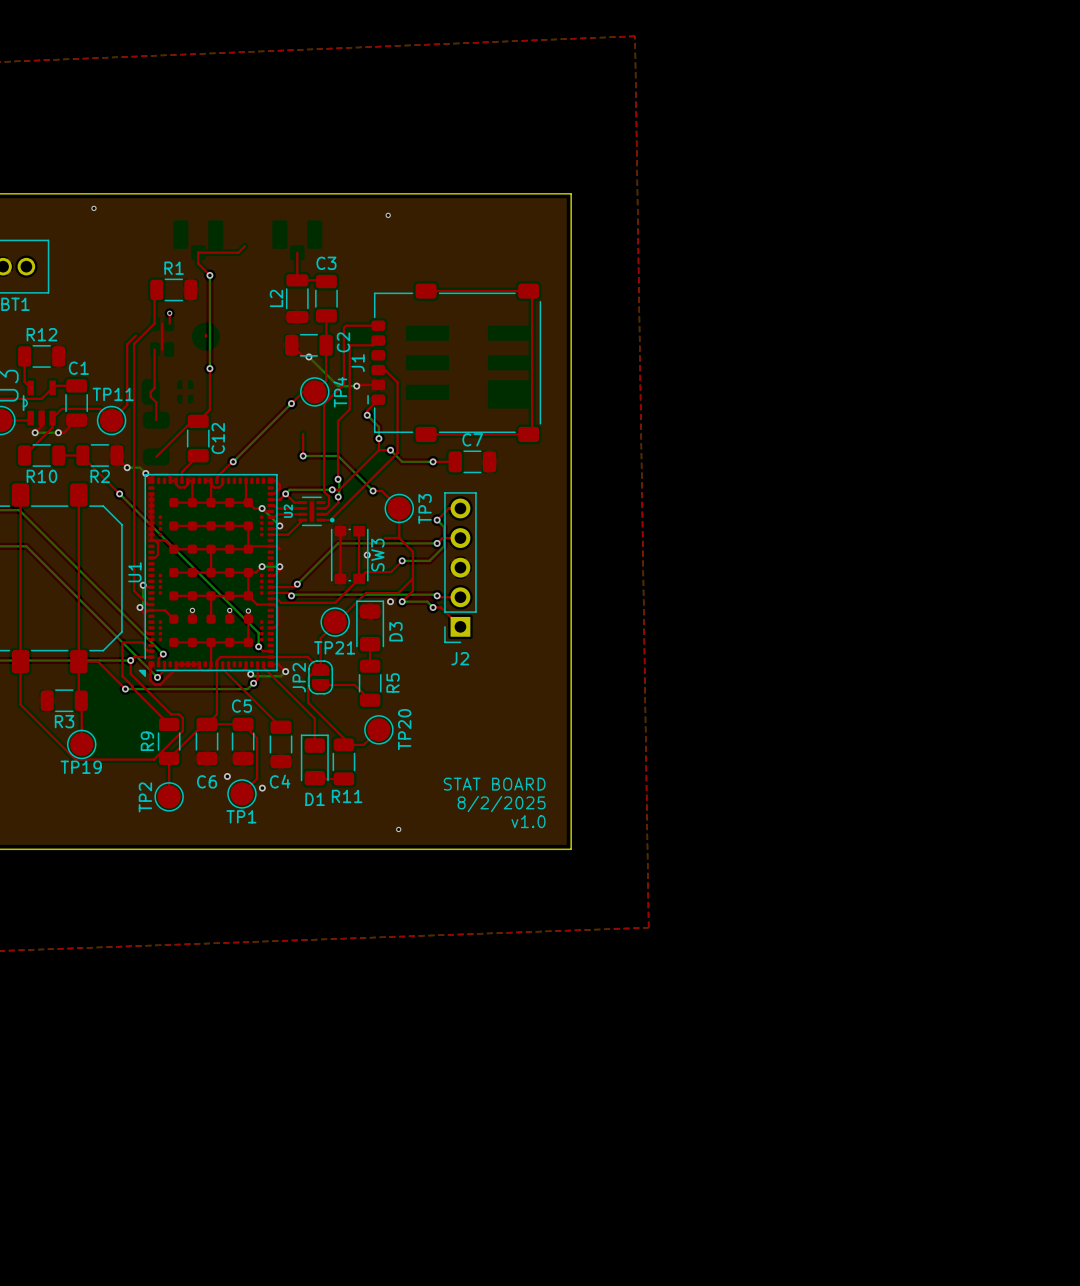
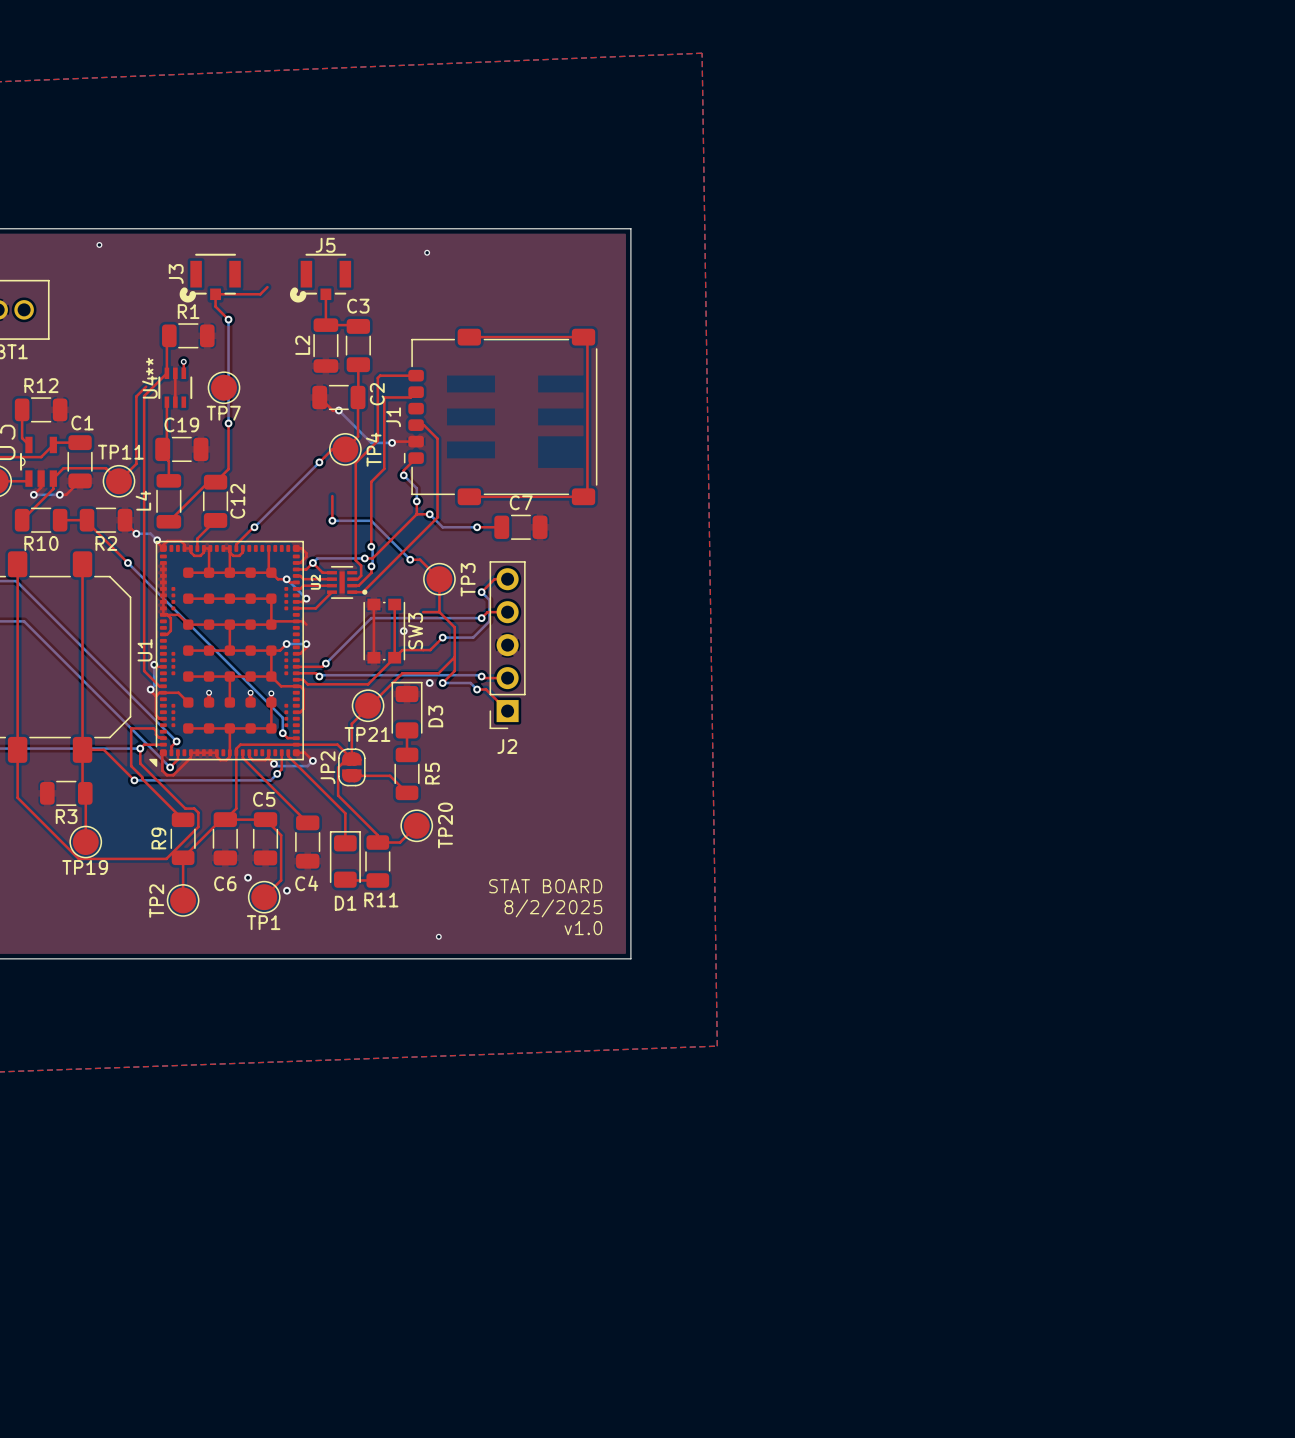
J3: none -> (210, 278)
J5: none -> (320, 278)
U4: none -> (175, 387)
TP7: none -> (224, 387)
C19: none -> (181, 449)
L4: none -> (168, 501)

